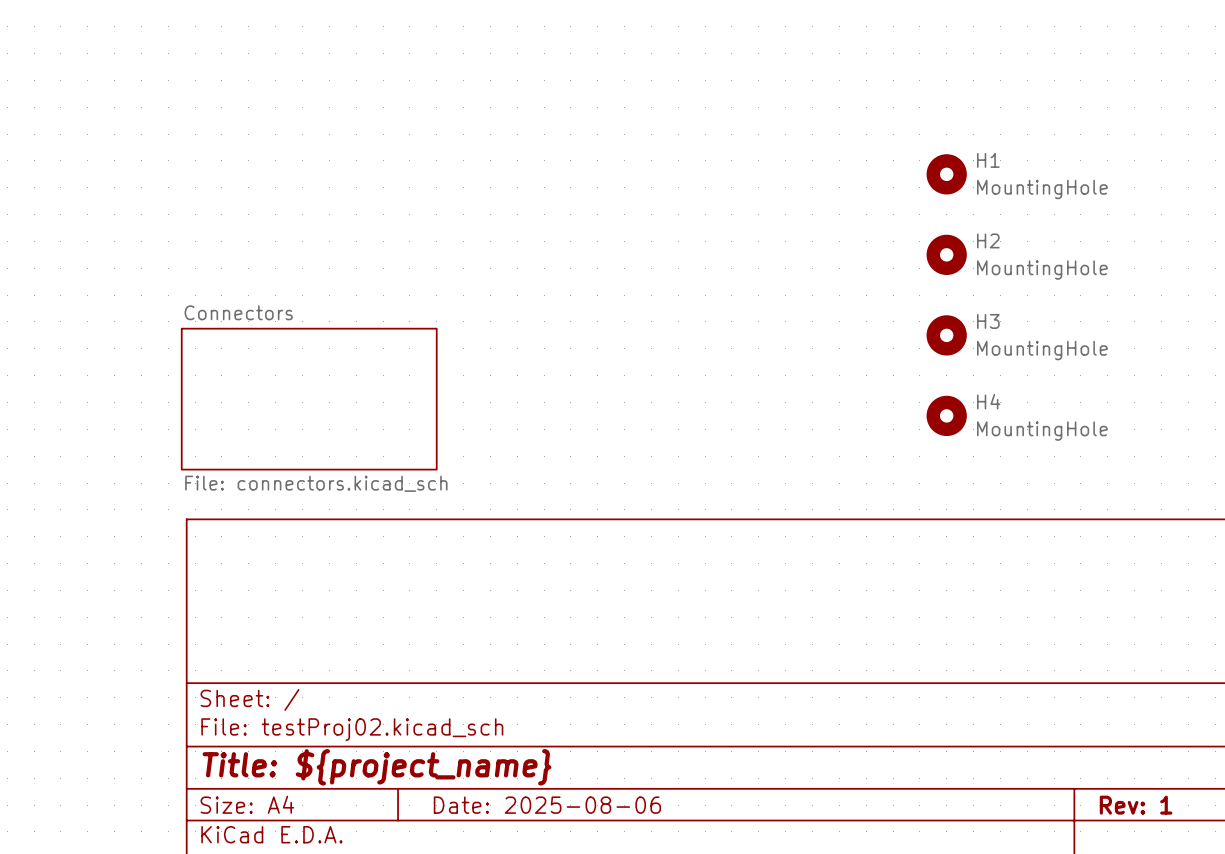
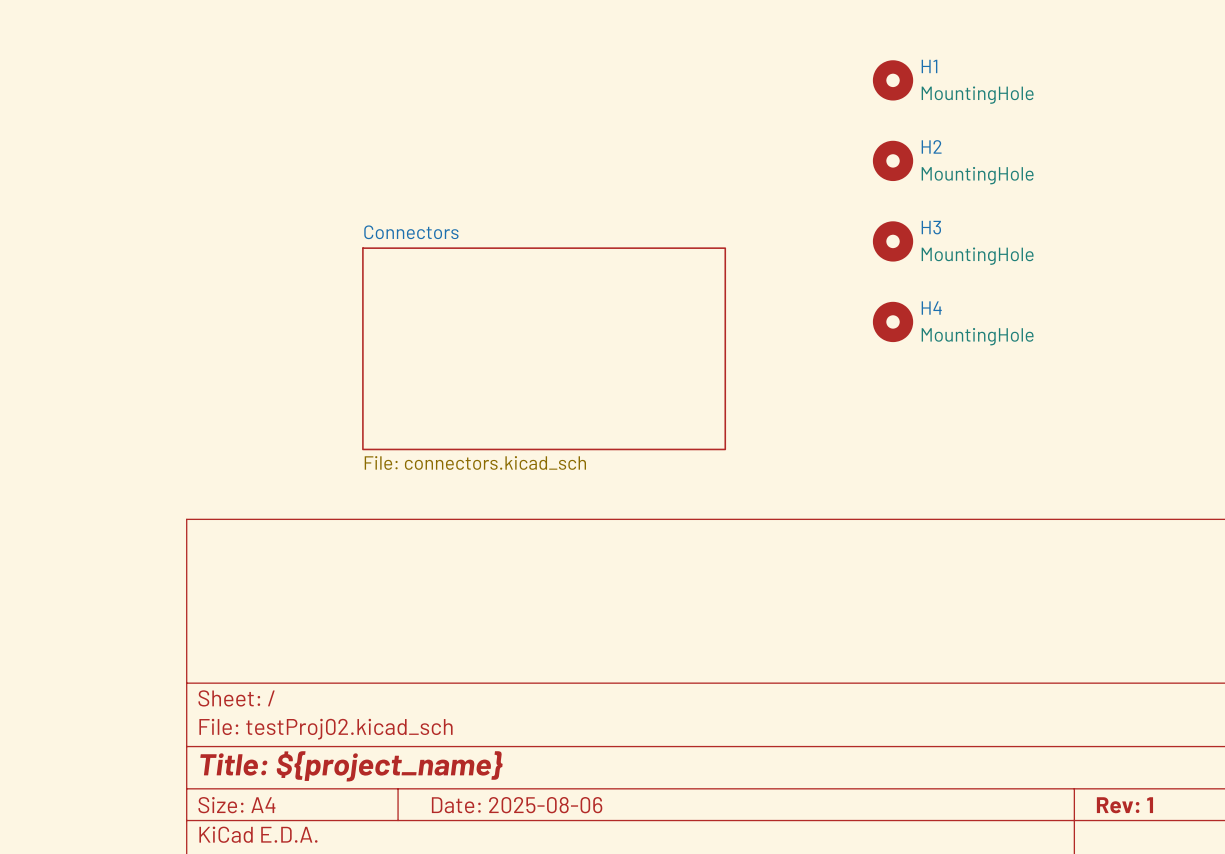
H1 position: (946, 174) -> (893, 80)
H2 position: (946, 254) -> (893, 160)
H3 position: (946, 335) -> (893, 241)
sheet Connectors: none -> File: connectors.kicad_sch (544, 348)
sheet Connectors: File: connectors.kicad_sch (309, 399) -> none
H4 position: (946, 415) -> (893, 321)

